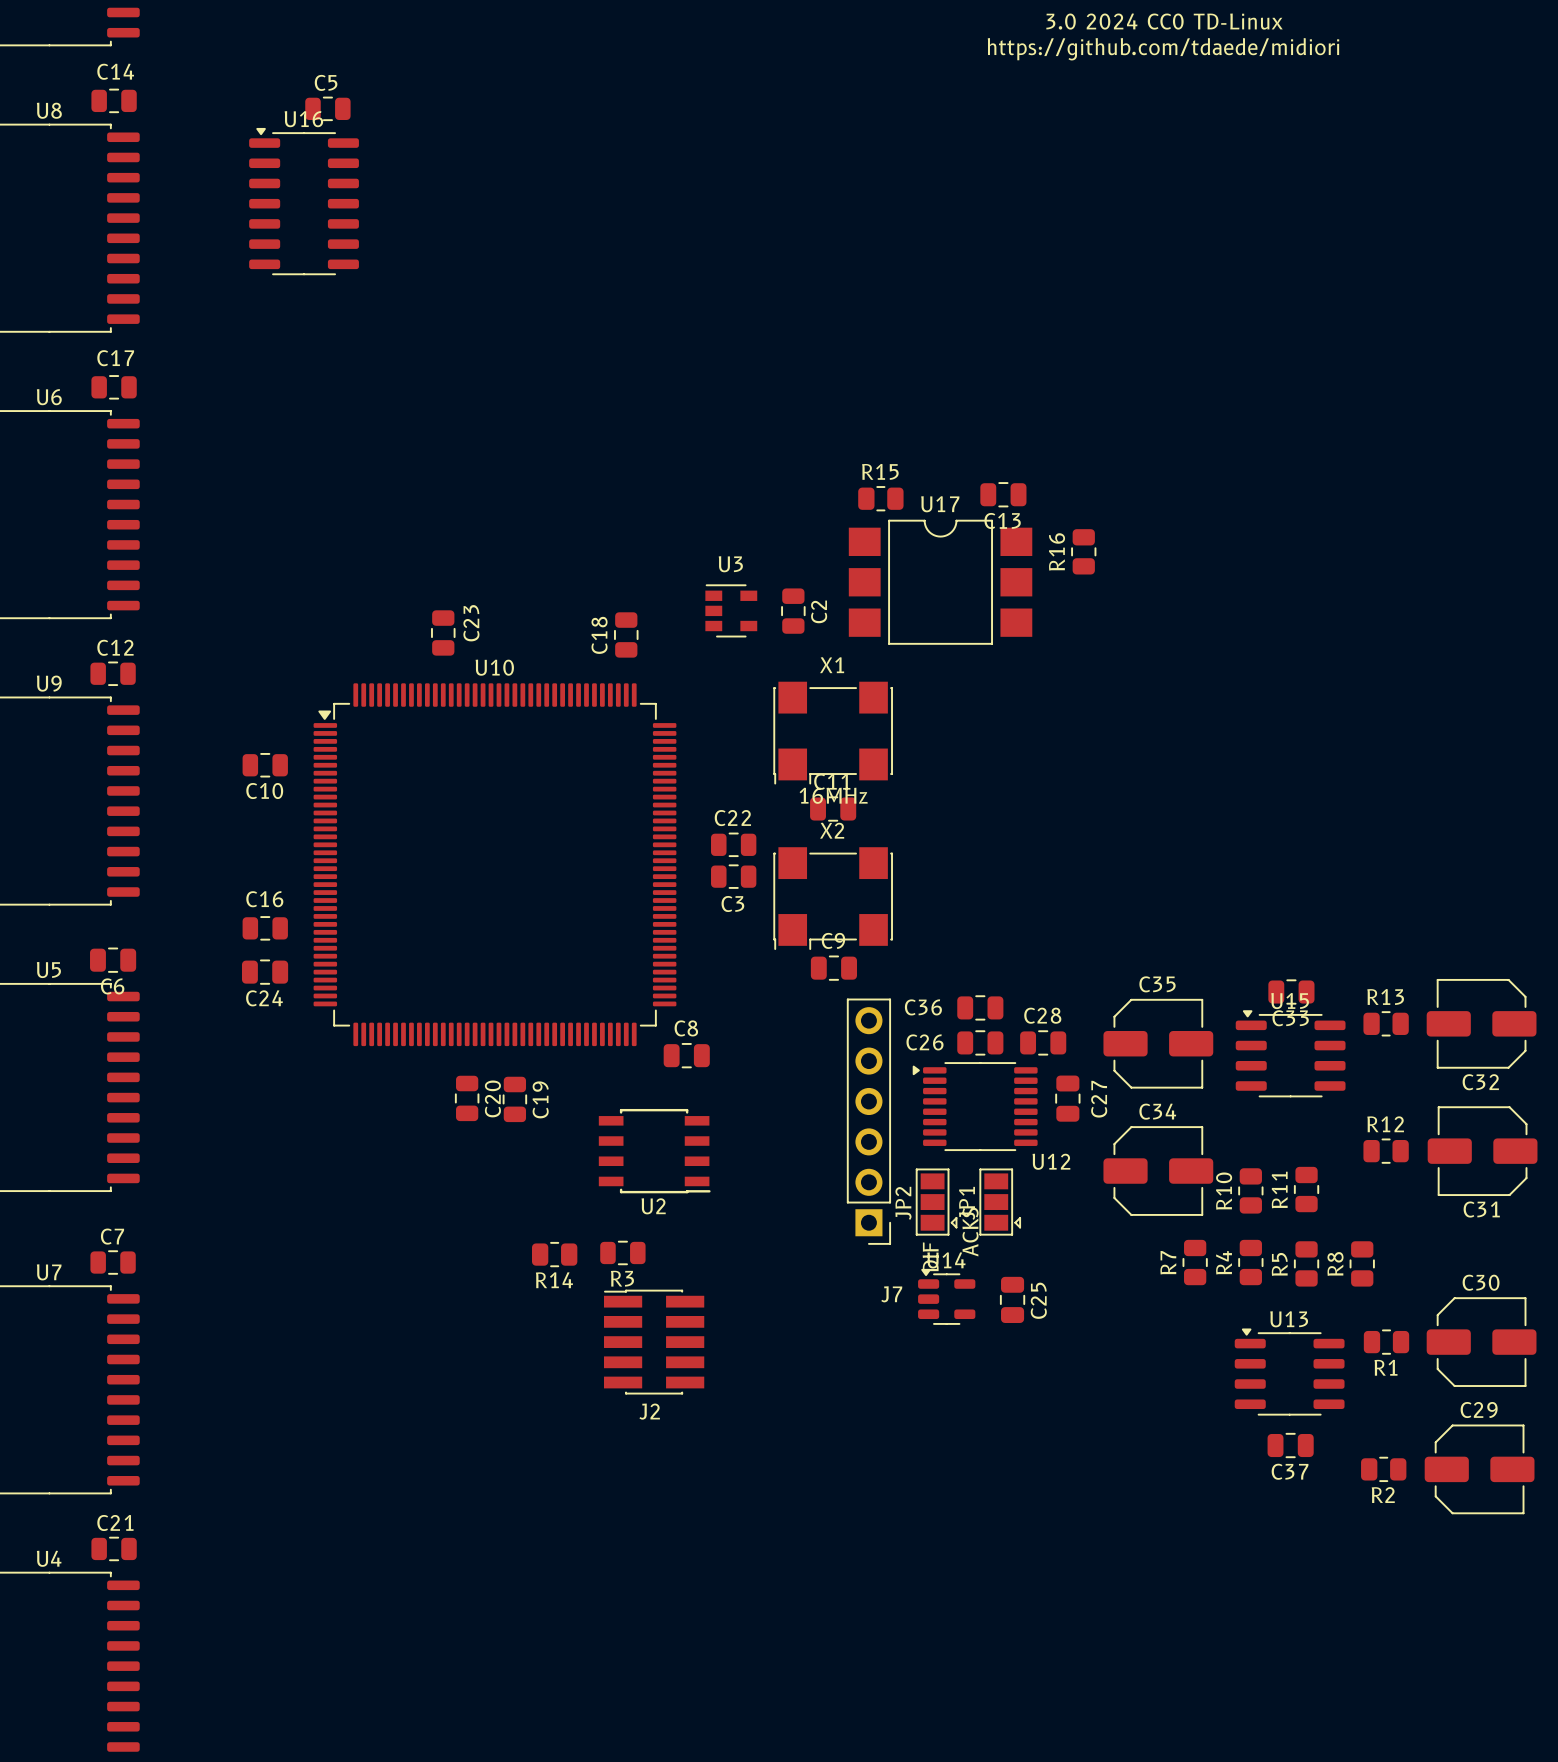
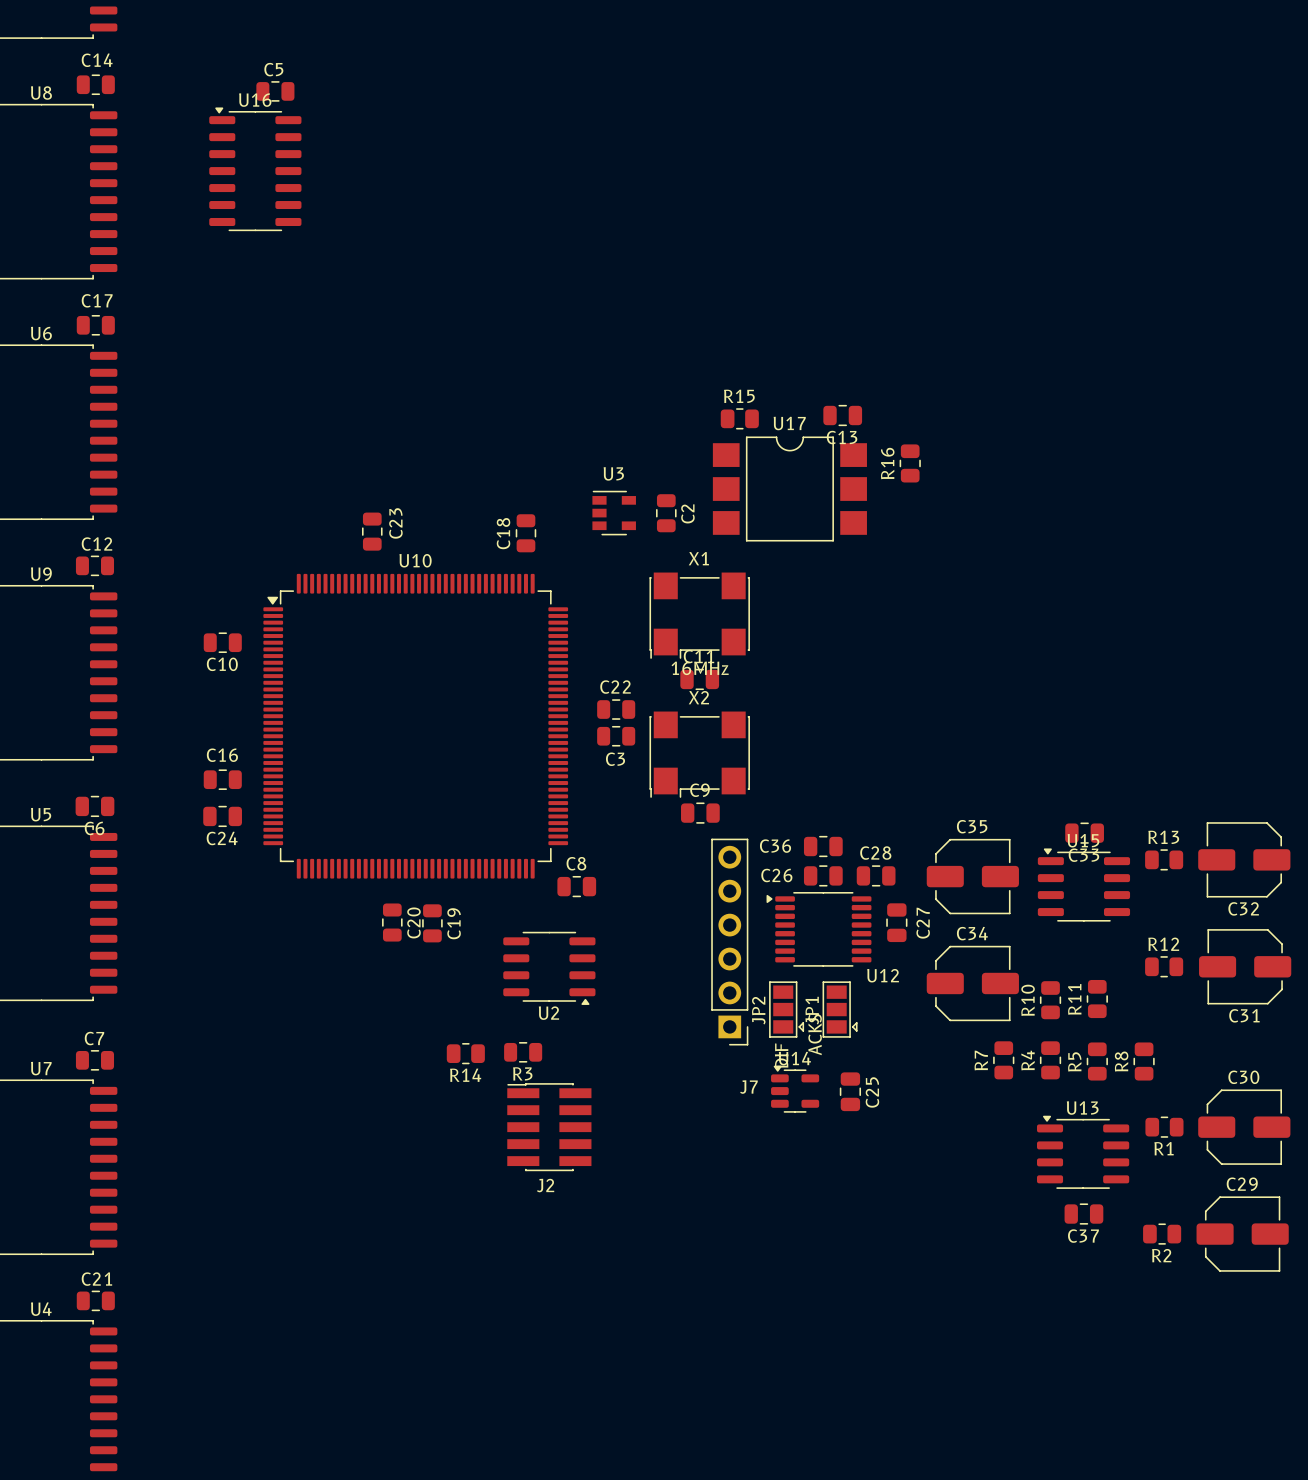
text: 3.0 2024 CC0 TD-Linux (1164, 21) -> none
text: https://github.com/tdaede/midiori (1163, 49) -> none
U2 footprint: [598, 1108, 711, 1194] -> [503, 931, 596, 1005]

